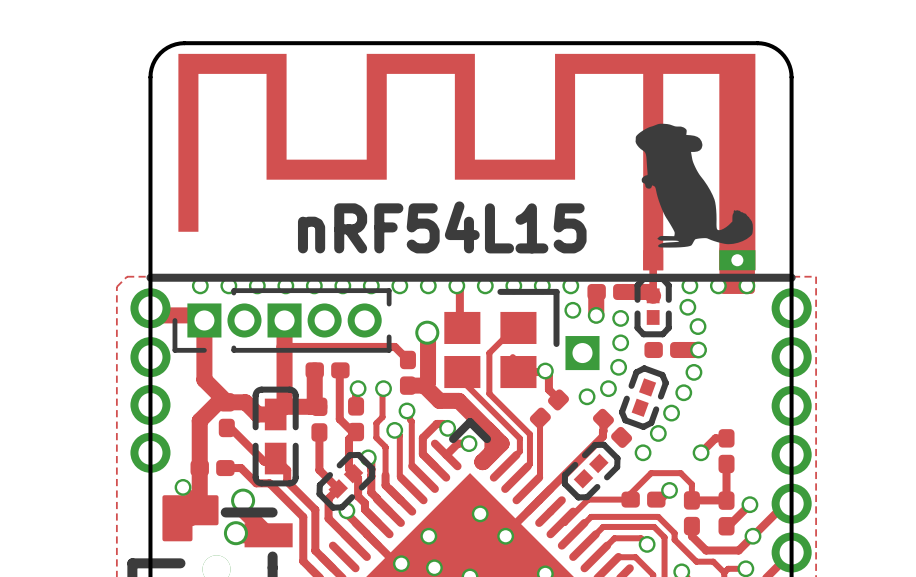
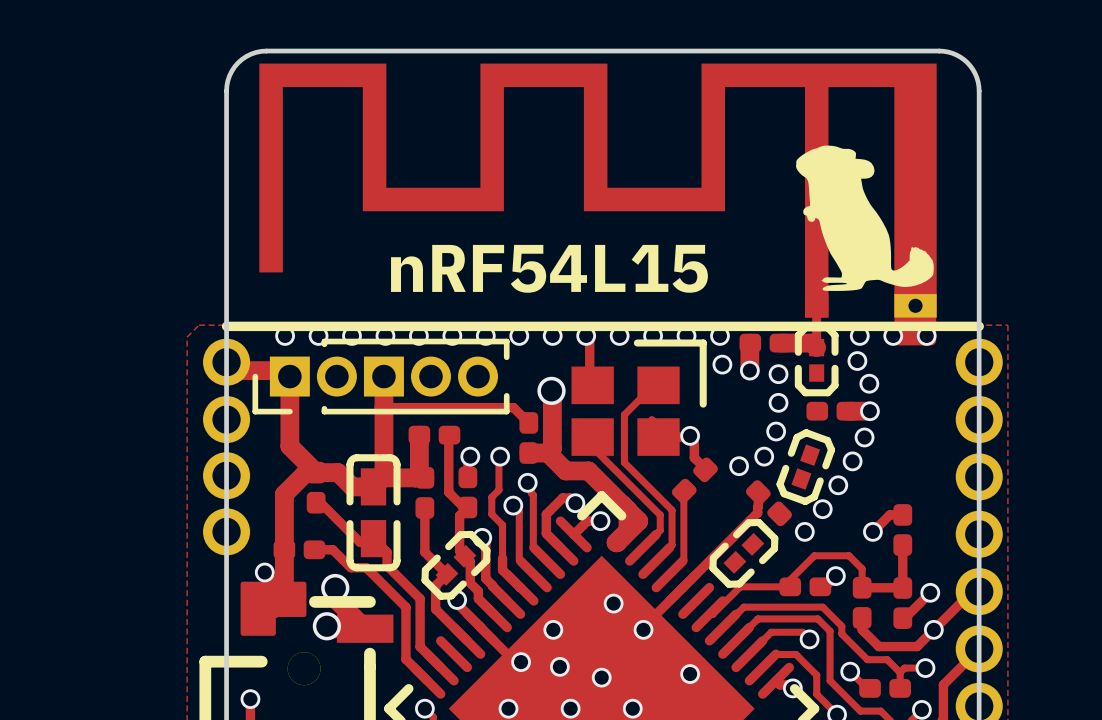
part: (582, 353) -> none

